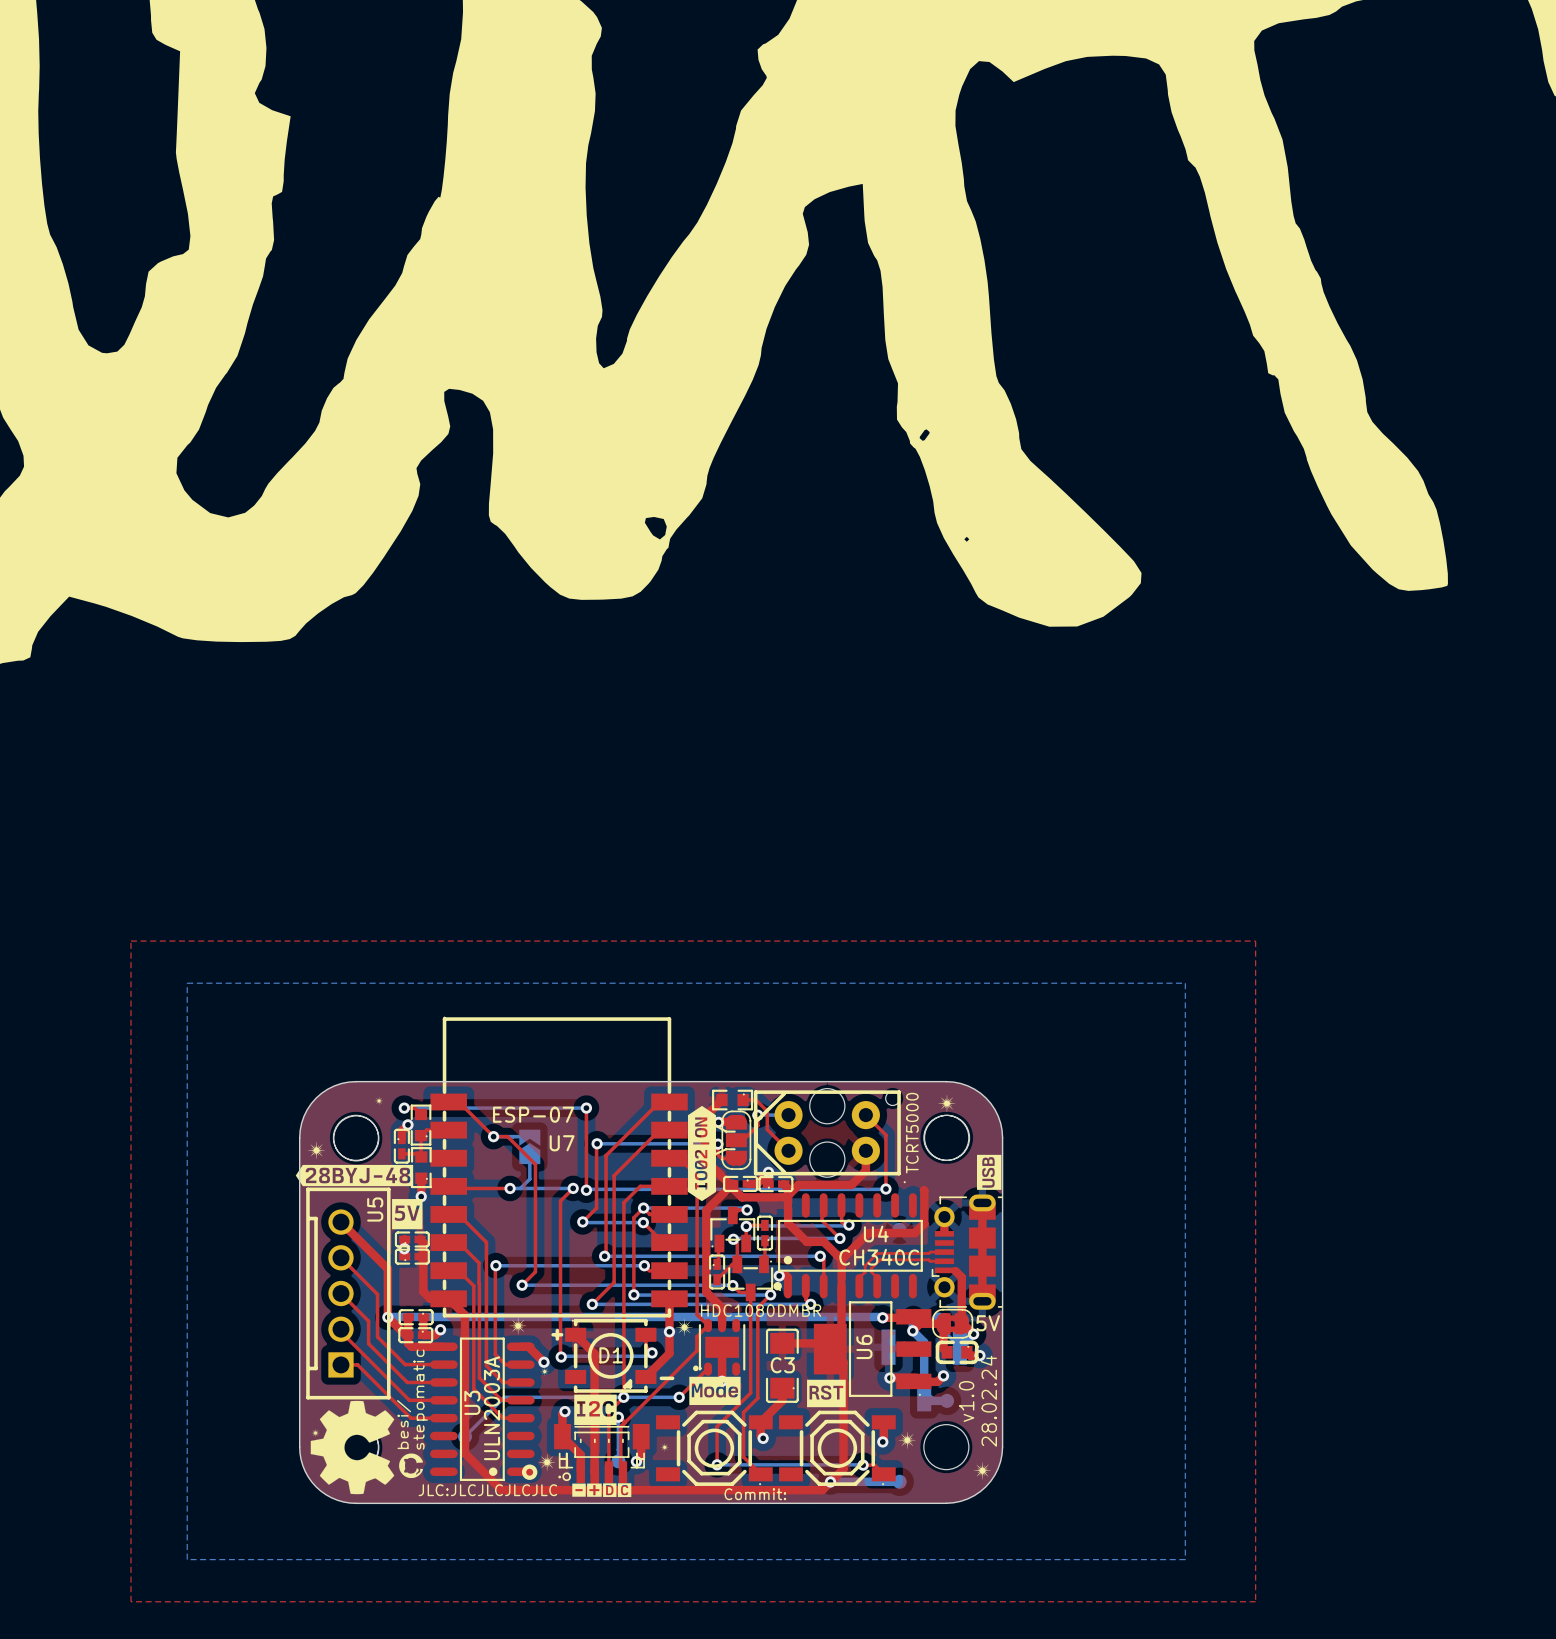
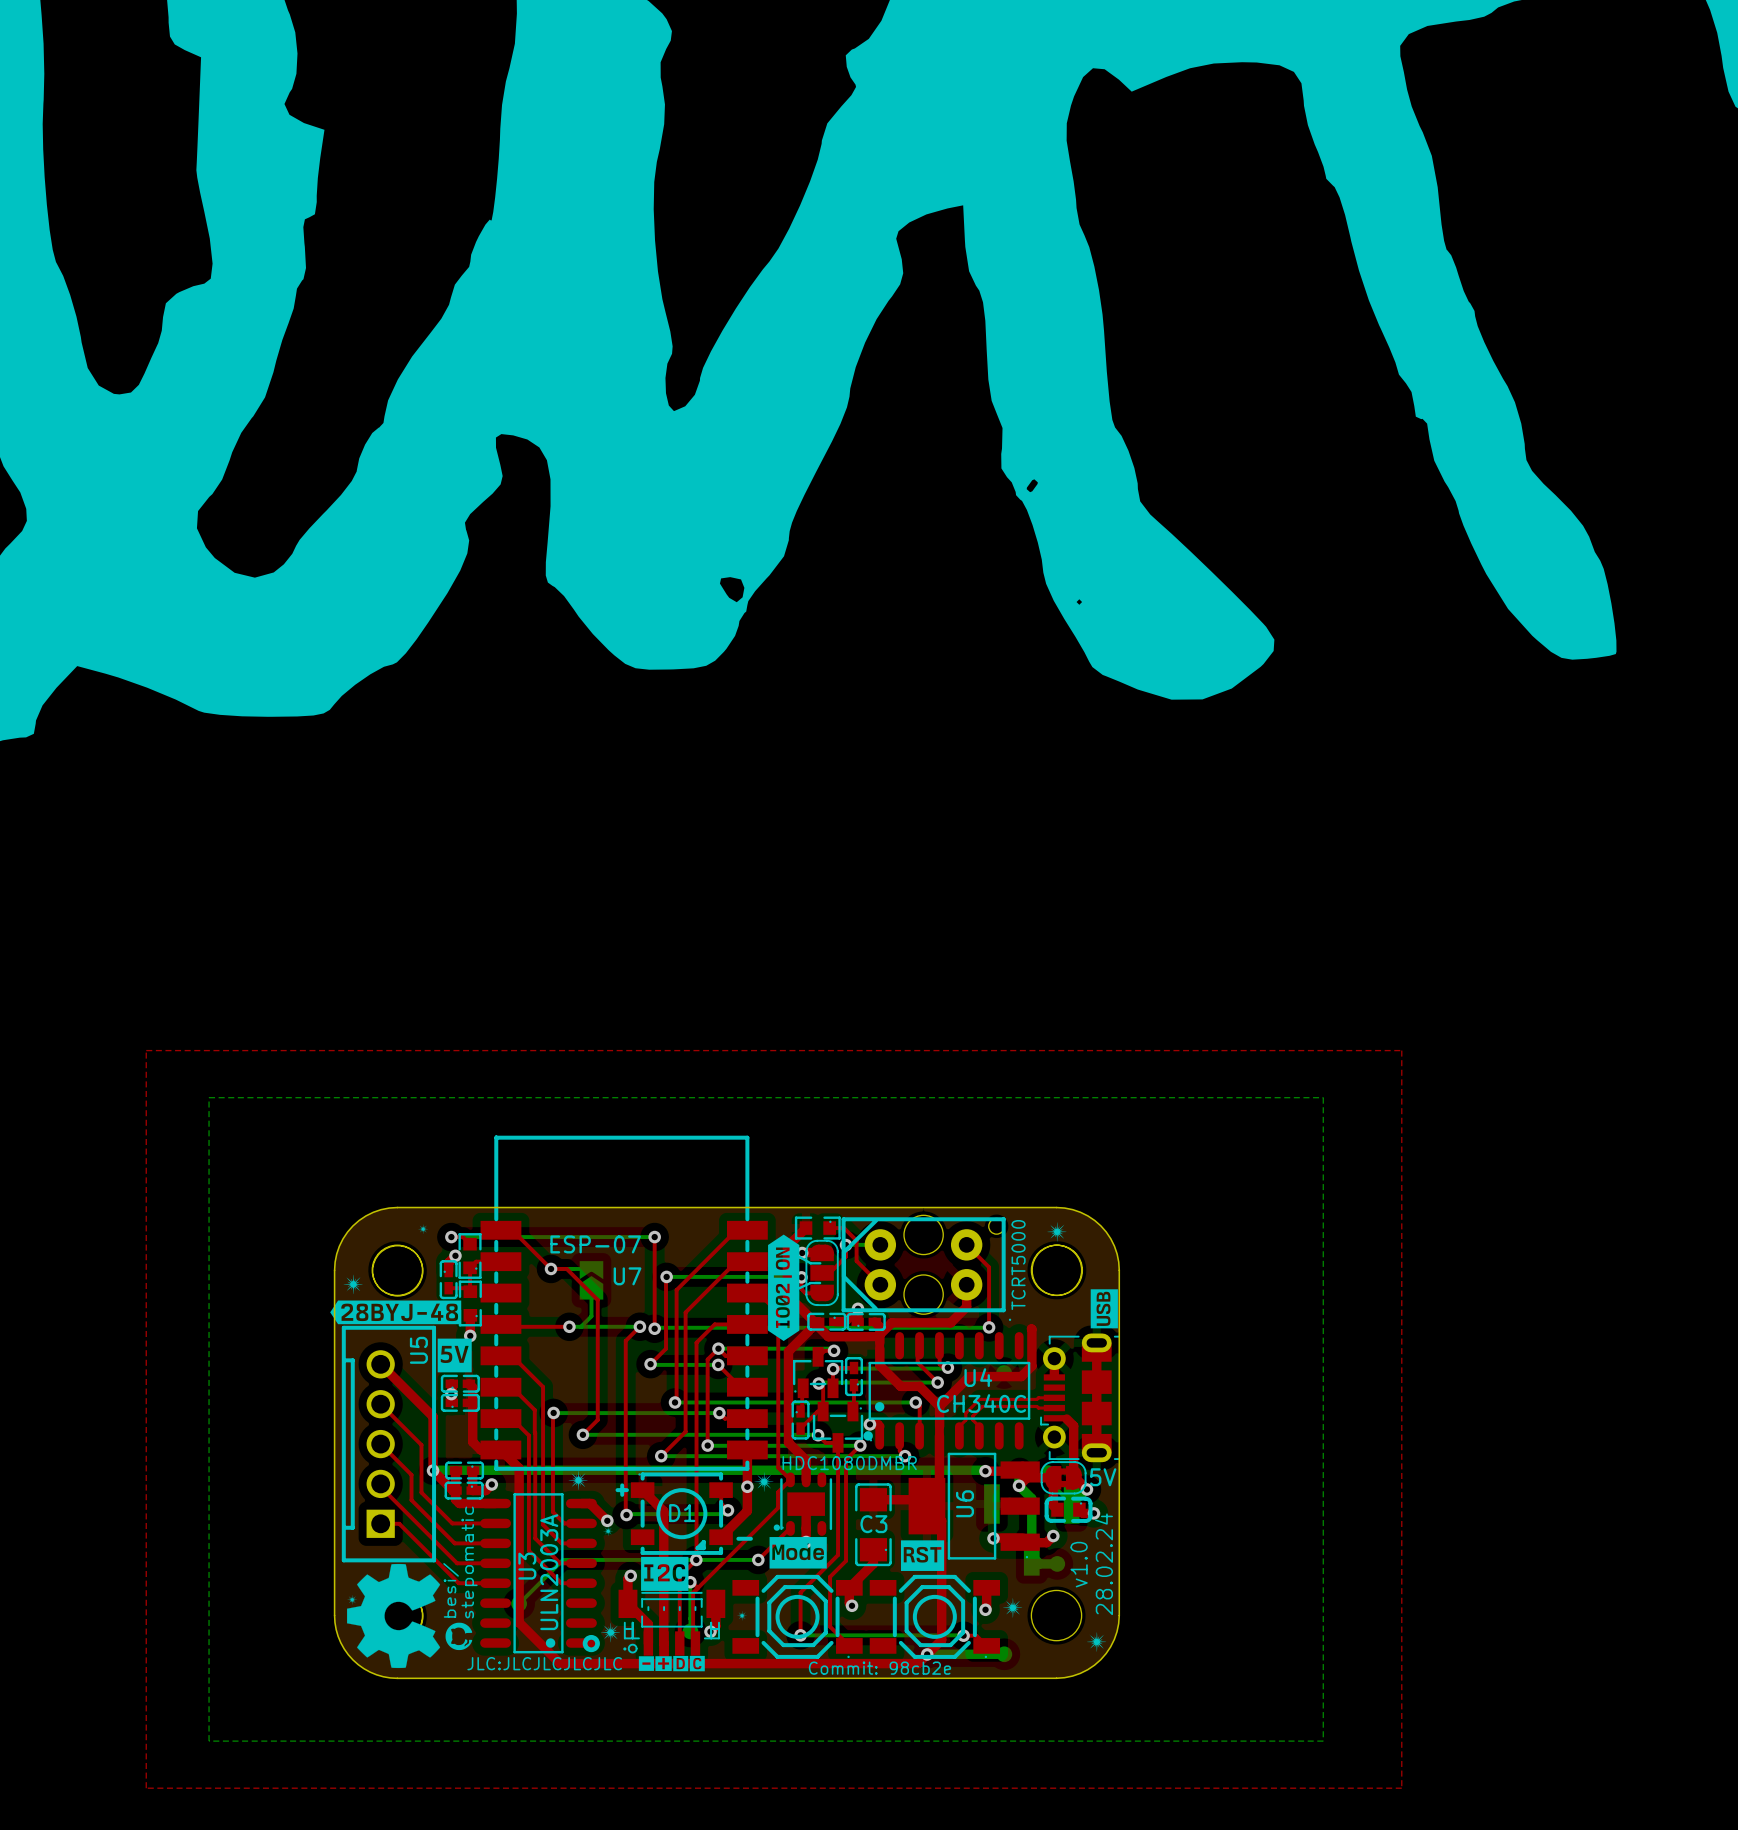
text: Commit: (755, 1494) -> Commit: 98cb2e (879, 1668)

